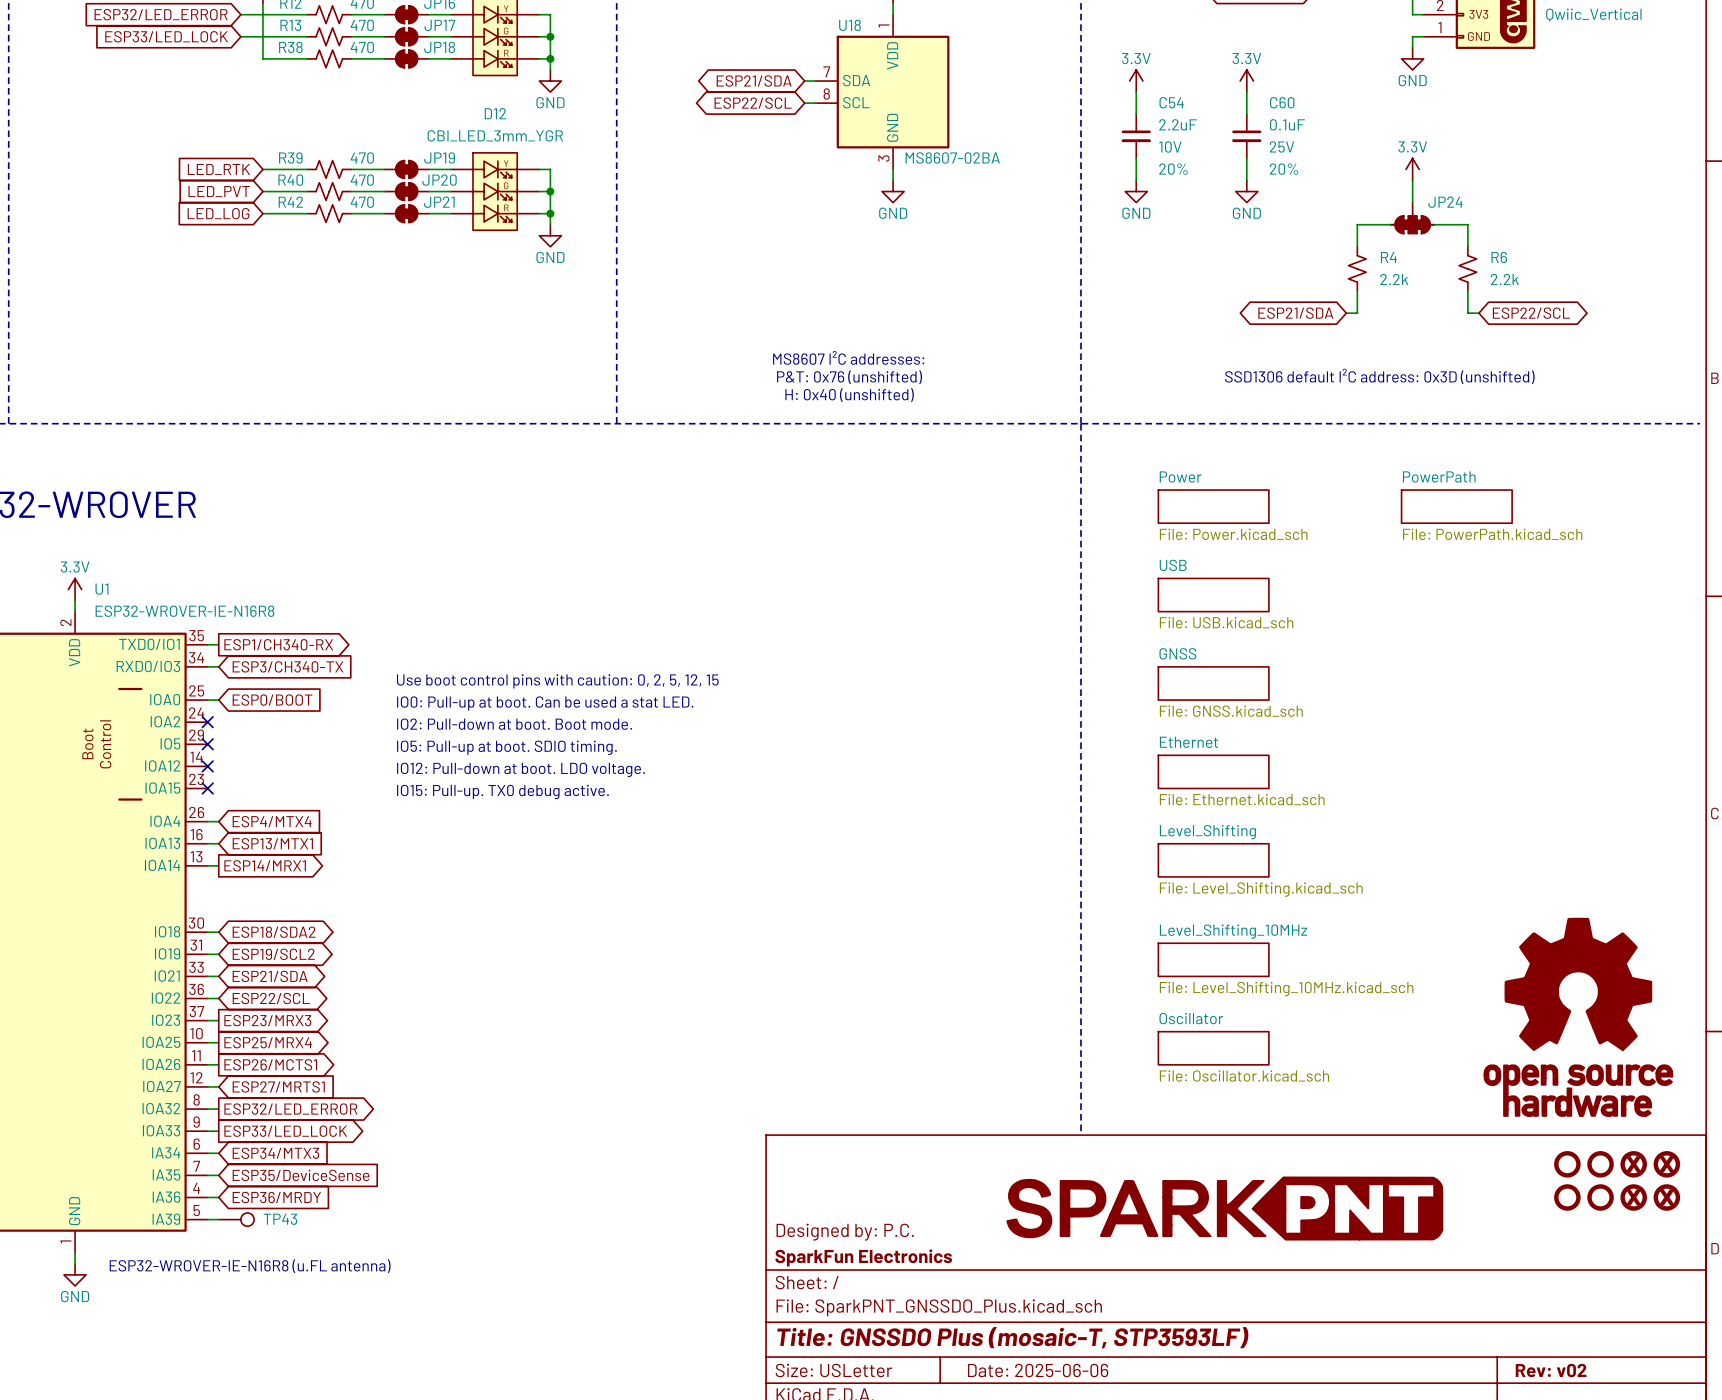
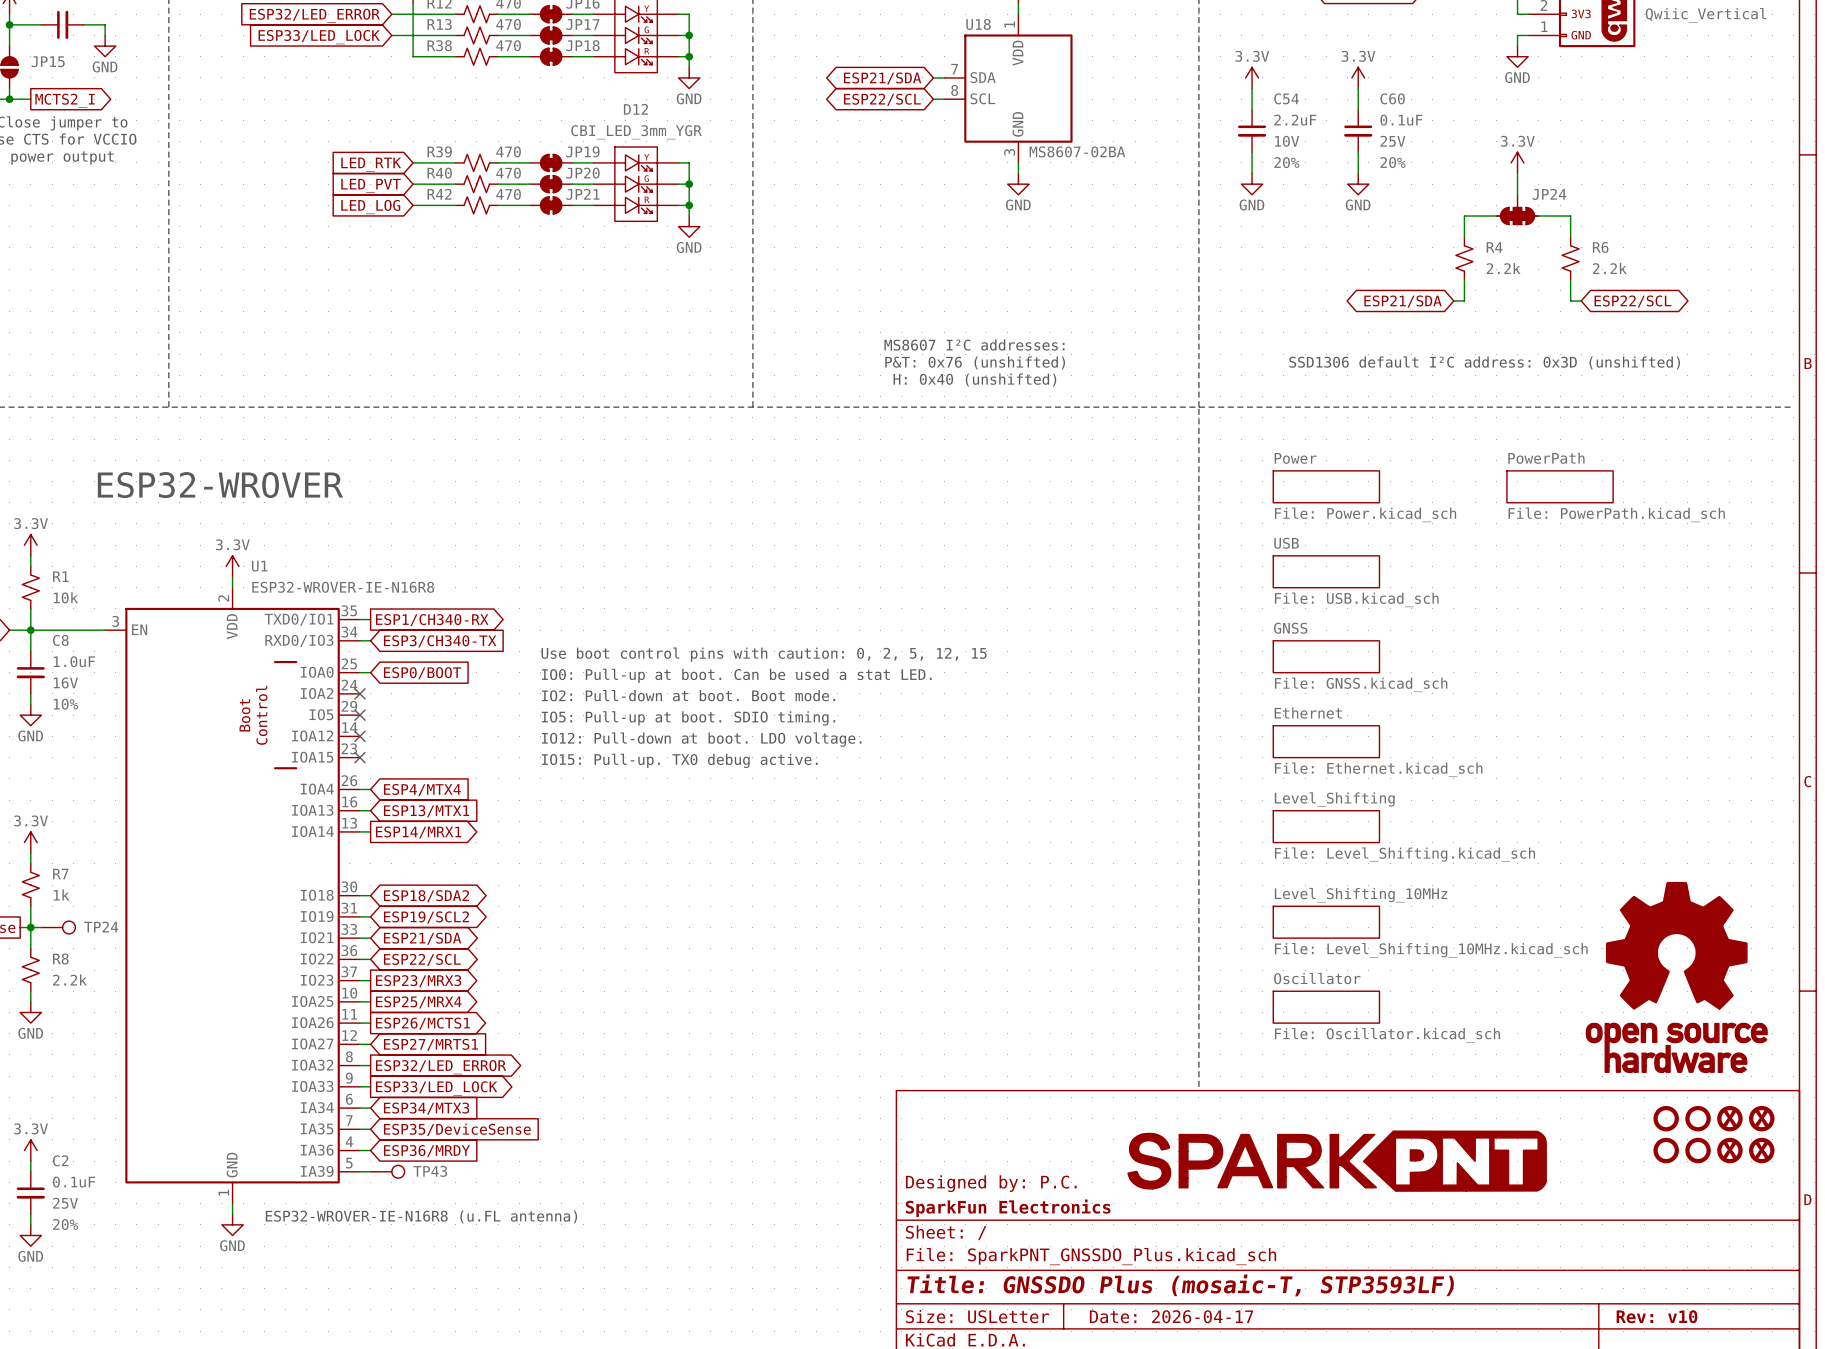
title block: Date: 2025-06-06 (1038, 1370) -> Date: 2026-04-17 (1171, 1316)
title block: Rev: v02 (1551, 1370) -> Rev: v10 (1657, 1316)

